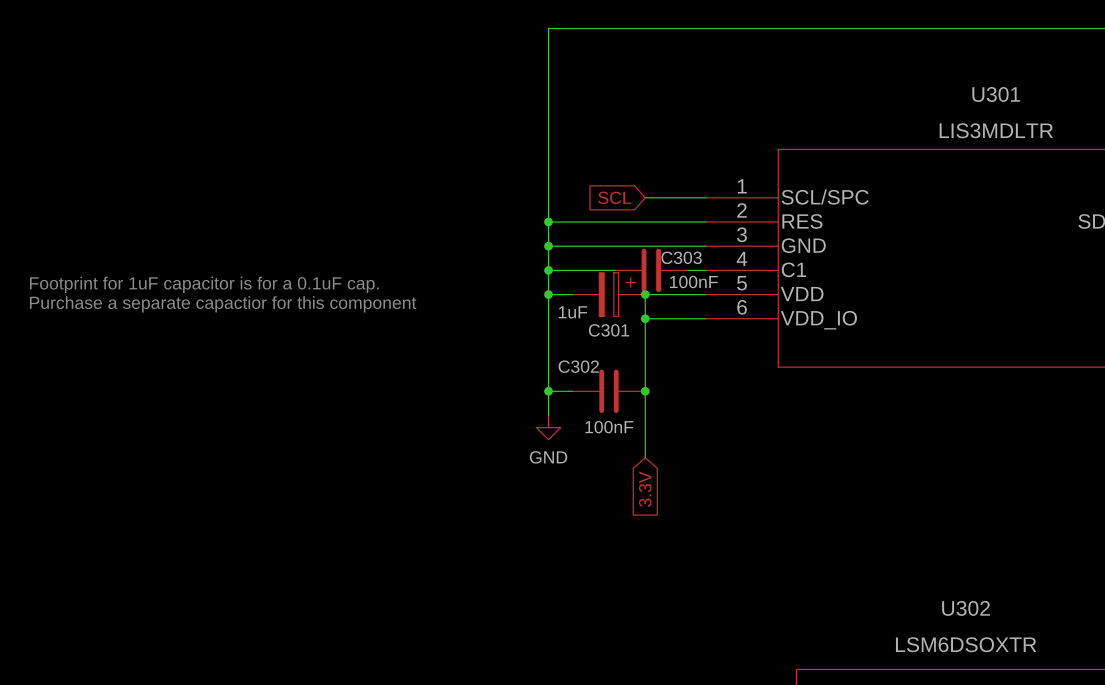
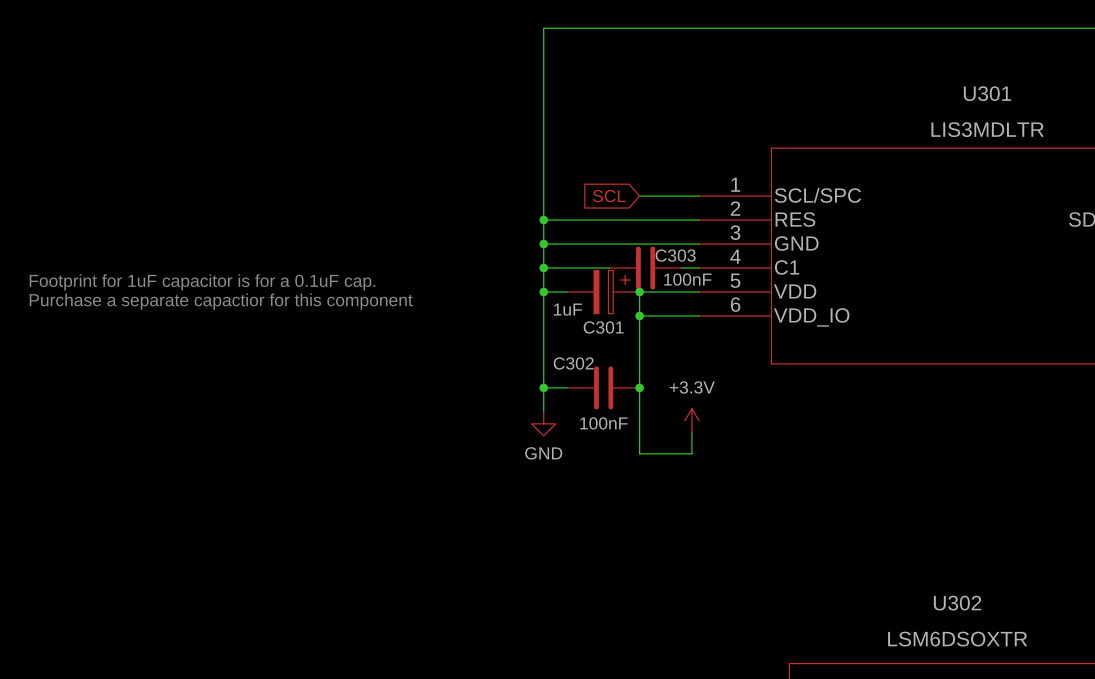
power symbol: none -> +3.3V (691, 420)
wire: none -> (691, 432) (691, 453) (639, 453)
global label: 3.3V (645, 489) -> none

